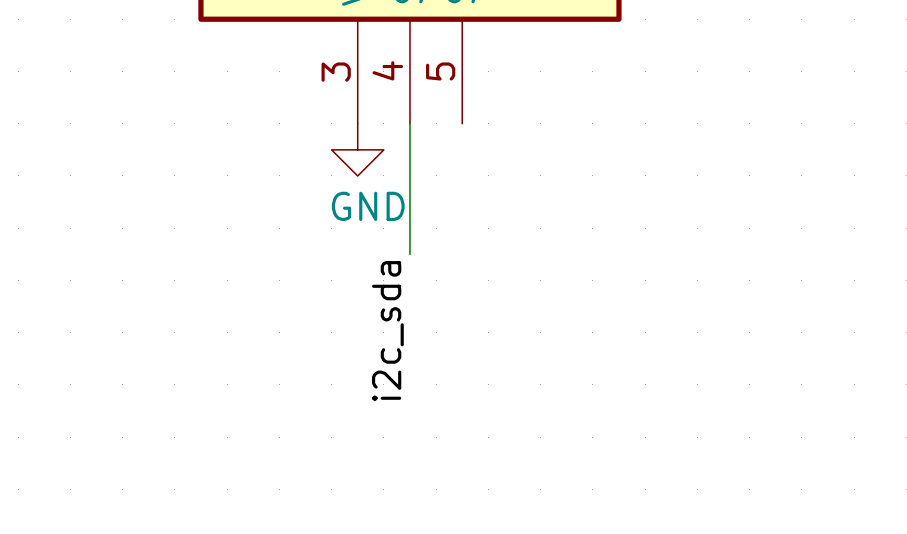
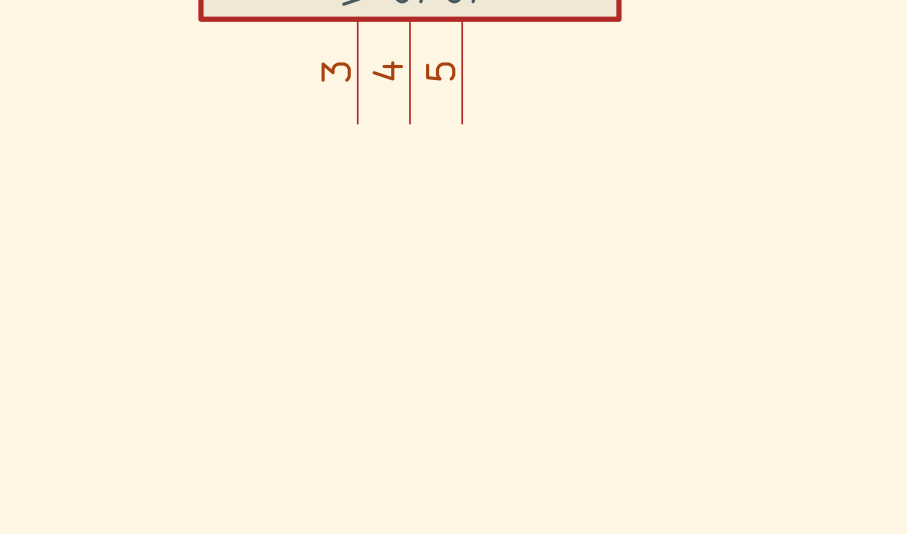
wire: (409, 123) (409, 254) -> none
power symbol: GND (357, 149) -> none
label: i2c_sda (387, 331) -> none

